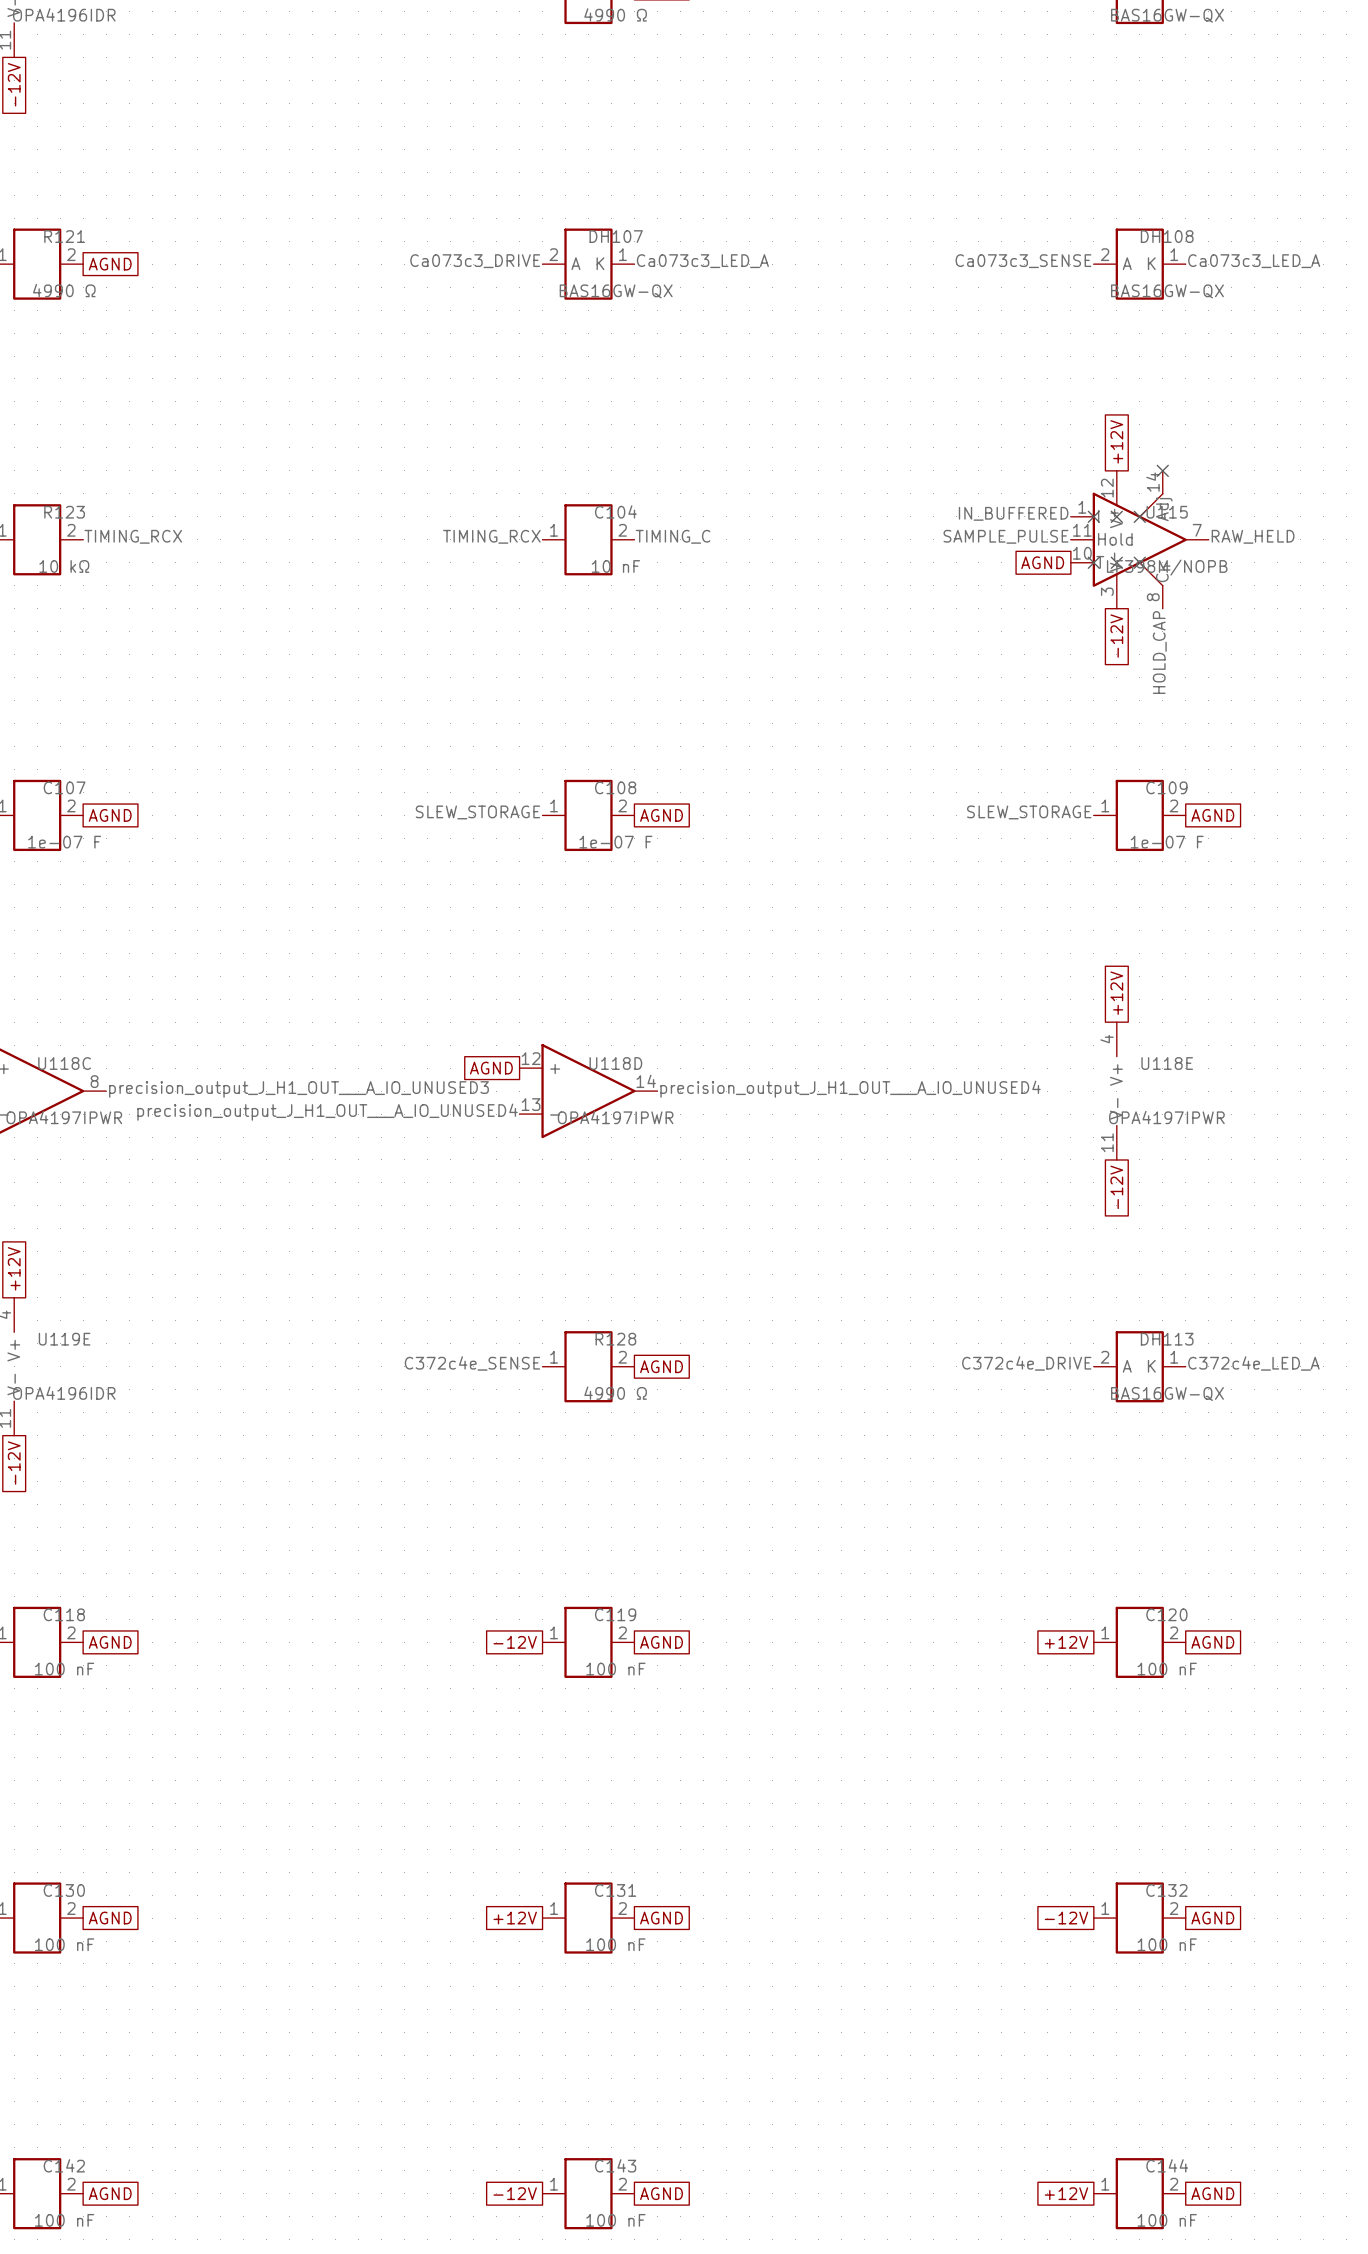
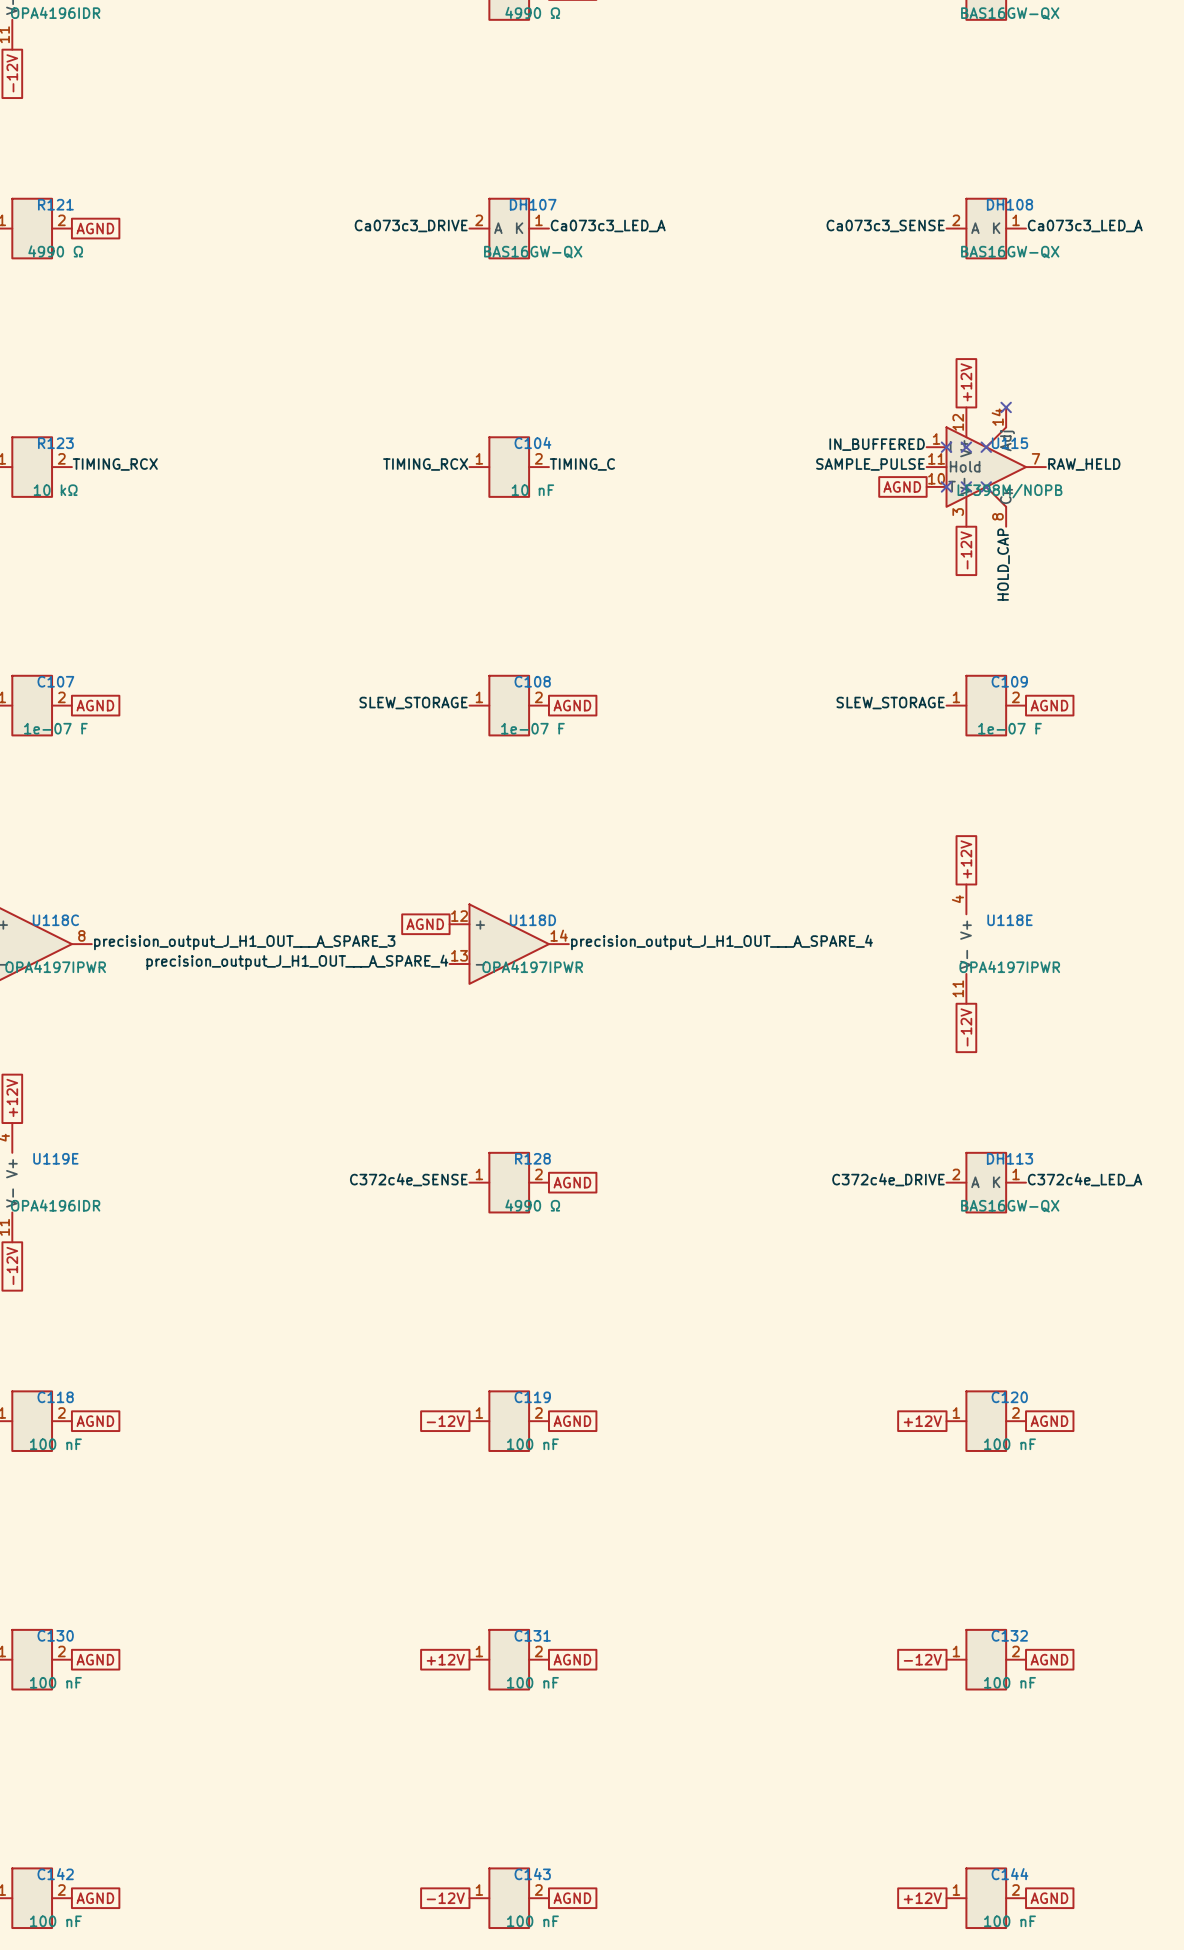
label: precision_output_J_H1_OUT___A_IO_UNUSED3 (298, 1089) -> precision_output_J_H1_OUT___A_SPARE_3 (244, 942)
label: precision_output_J_H1_OUT___A_IO_UNUSED4 (850, 1089) -> precision_output_J_H1_OUT___A_SPARE_4 (722, 942)
label: precision_output_J_H1_OUT___A_IO_UNUSED4 (327, 1112) -> precision_output_J_H1_OUT___A_SPARE_4 (297, 962)

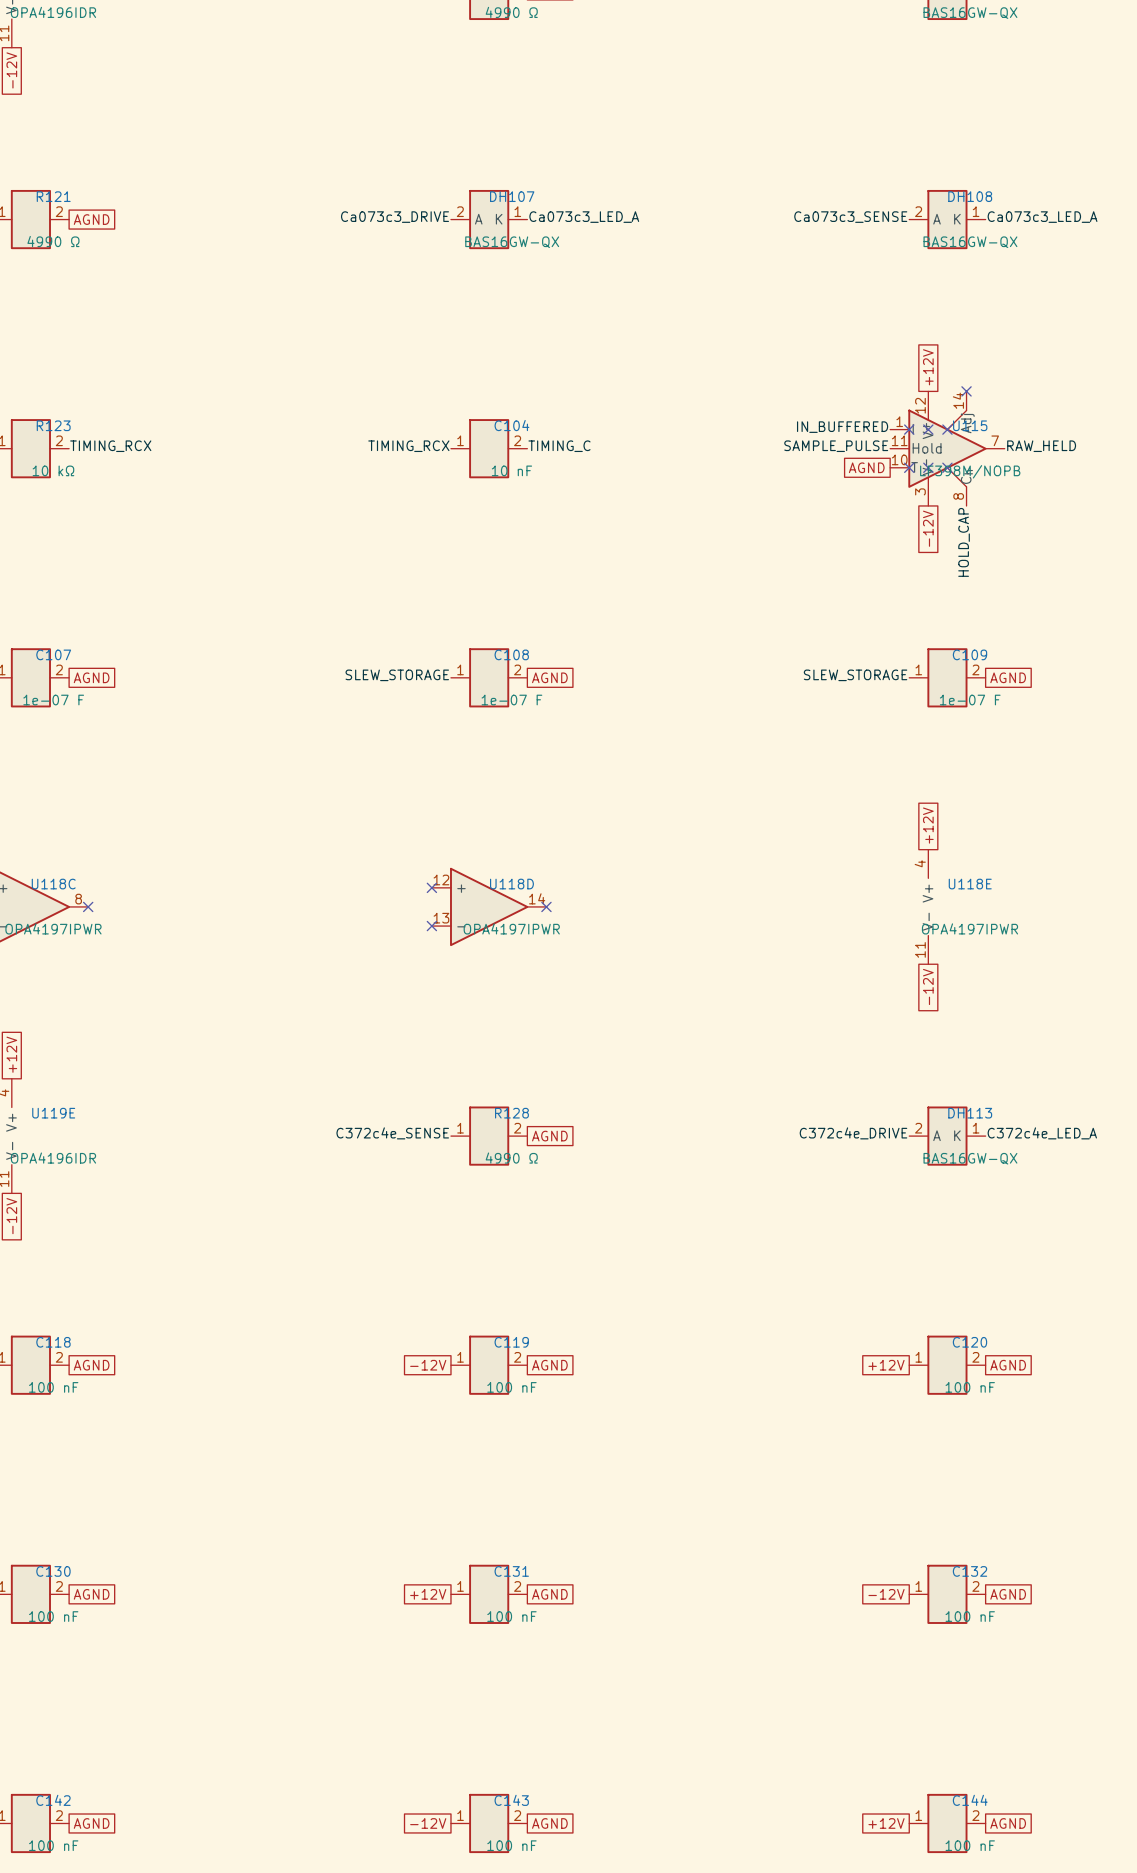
global label: AGND (425, 924) -> none
no-connect mark: none -> (431, 887)
label: precision_output_J_H1_OUT___A_SPARE_3 (244, 942) -> none
label: precision_output_J_H1_OUT___A_SPARE_4 (722, 942) -> none
no-connect mark: none -> (88, 906)
no-connect mark: none -> (546, 906)
label: precision_output_J_H1_OUT___A_SPARE_4 (297, 962) -> none
no-connect mark: none -> (431, 926)

